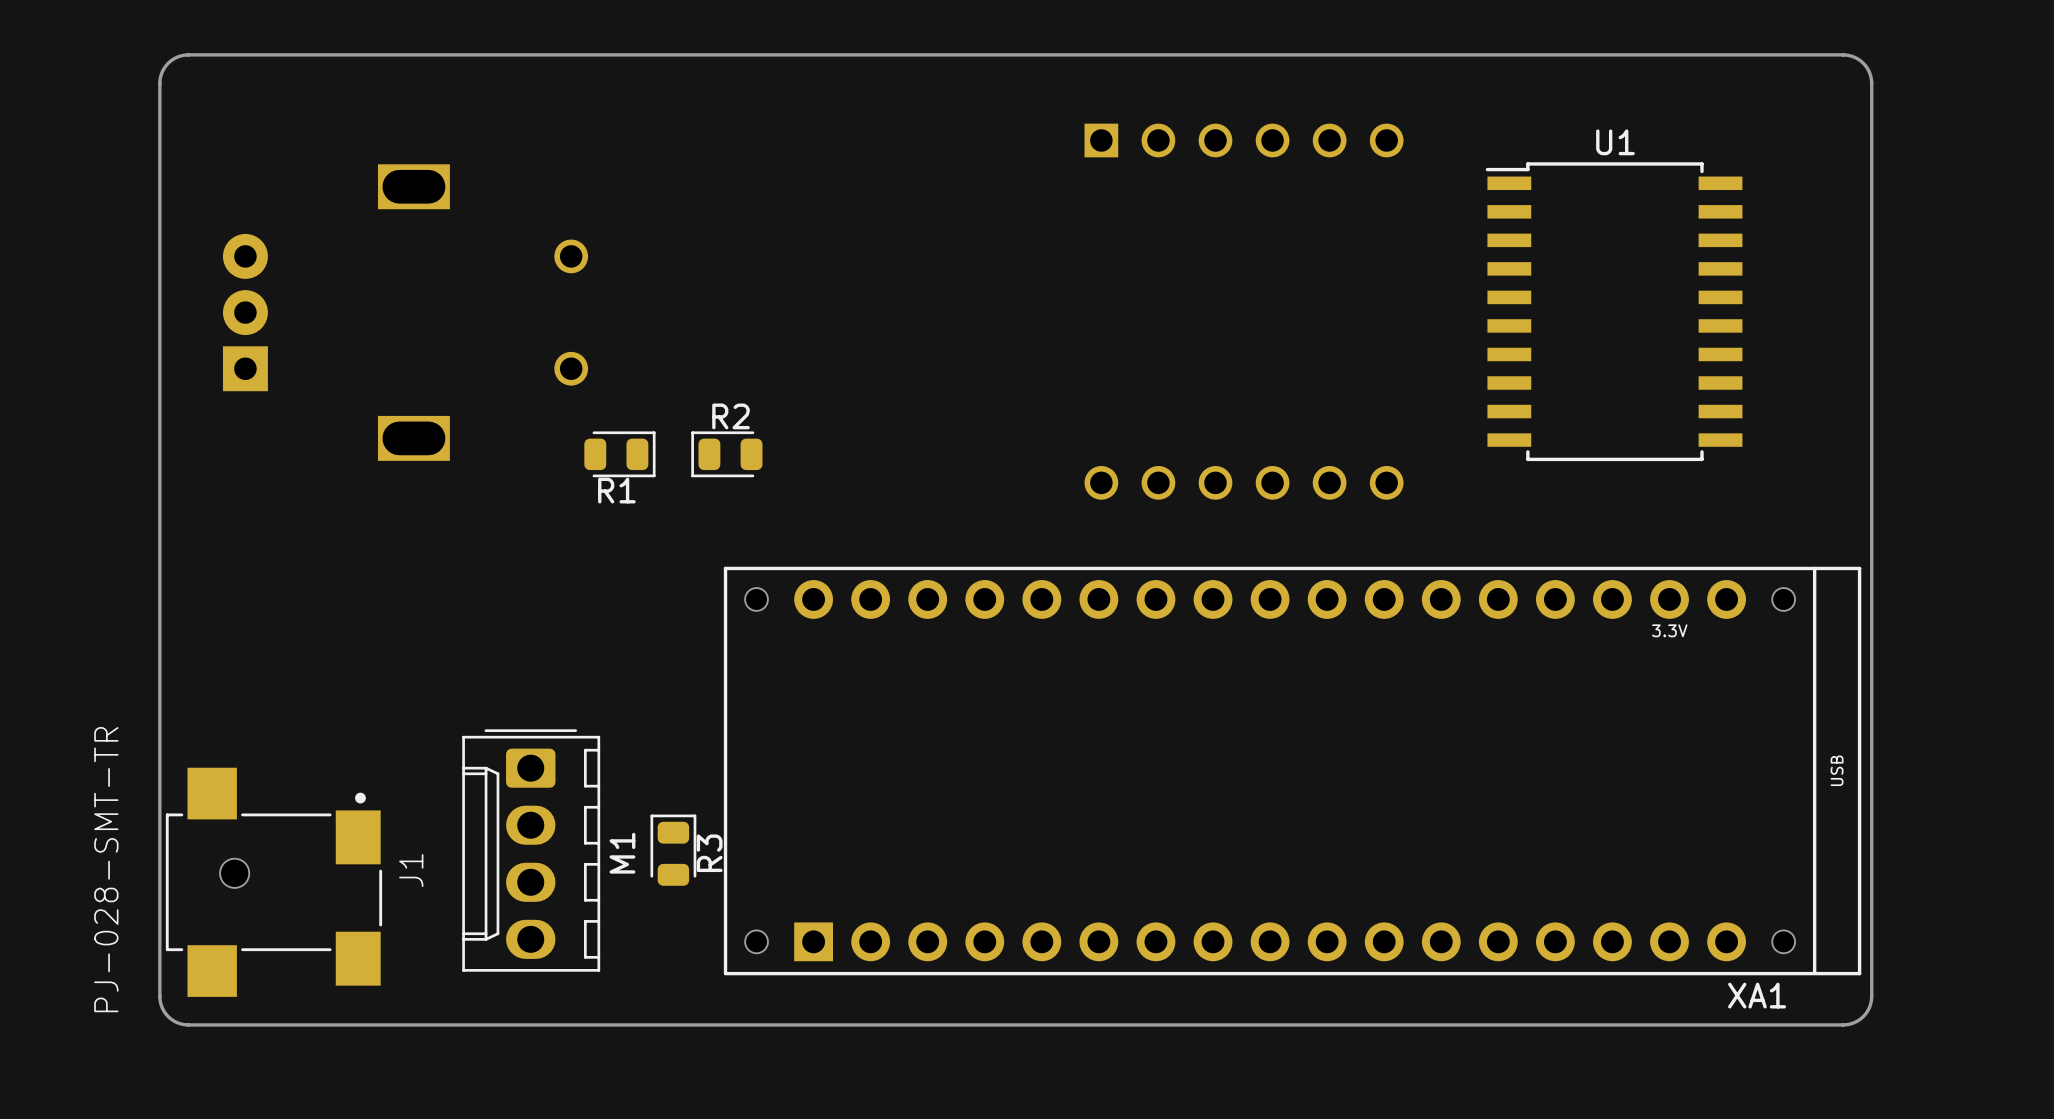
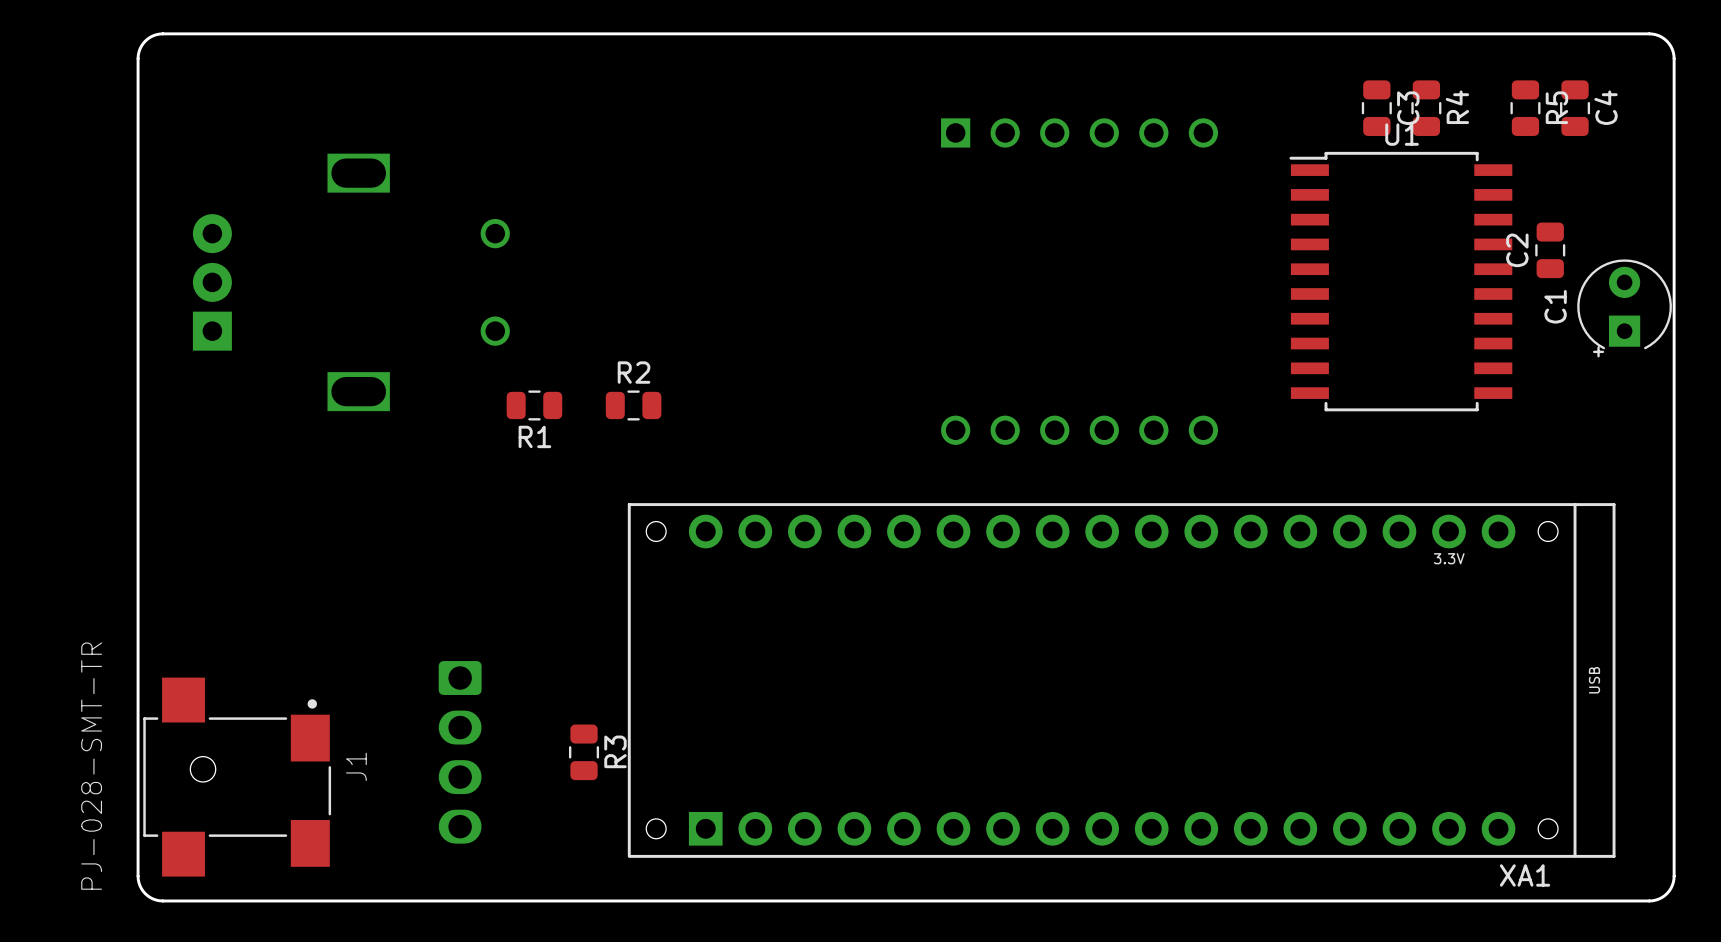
board edge: (159, 83) (162, 72) (168, 63) (177, 57) (188, 54) (1843, 54) (1857, 58) (1867, 69) (1871, 83) (1871, 996) (1869, 1007) (1863, 1016) (1854, 1022) (1843, 1024) -> (138, 83) (138, 55) (141, 46) (150, 37) (162, 33) (1649, 33) (1661, 37) (1670, 46) (1674, 58) (1673, 879) (1669, 891) (1655, 900) (1599, 900)
C3: none -> (1376, 108)
R4: none -> (1426, 108)
R5: none -> (1525, 108)
C4: none -> (1575, 108)
C2: none -> (1550, 250)
C1: none -> (1624, 308)
R1 footprint: [584, 431, 656, 478] -> [506, 390, 563, 421]
R2 footprint: [691, 431, 763, 478] -> [605, 390, 662, 421]
R3 footprint: [650, 814, 697, 886] -> [569, 724, 600, 781]
M1 side: top (531, 850) -> bottom (460, 752)

